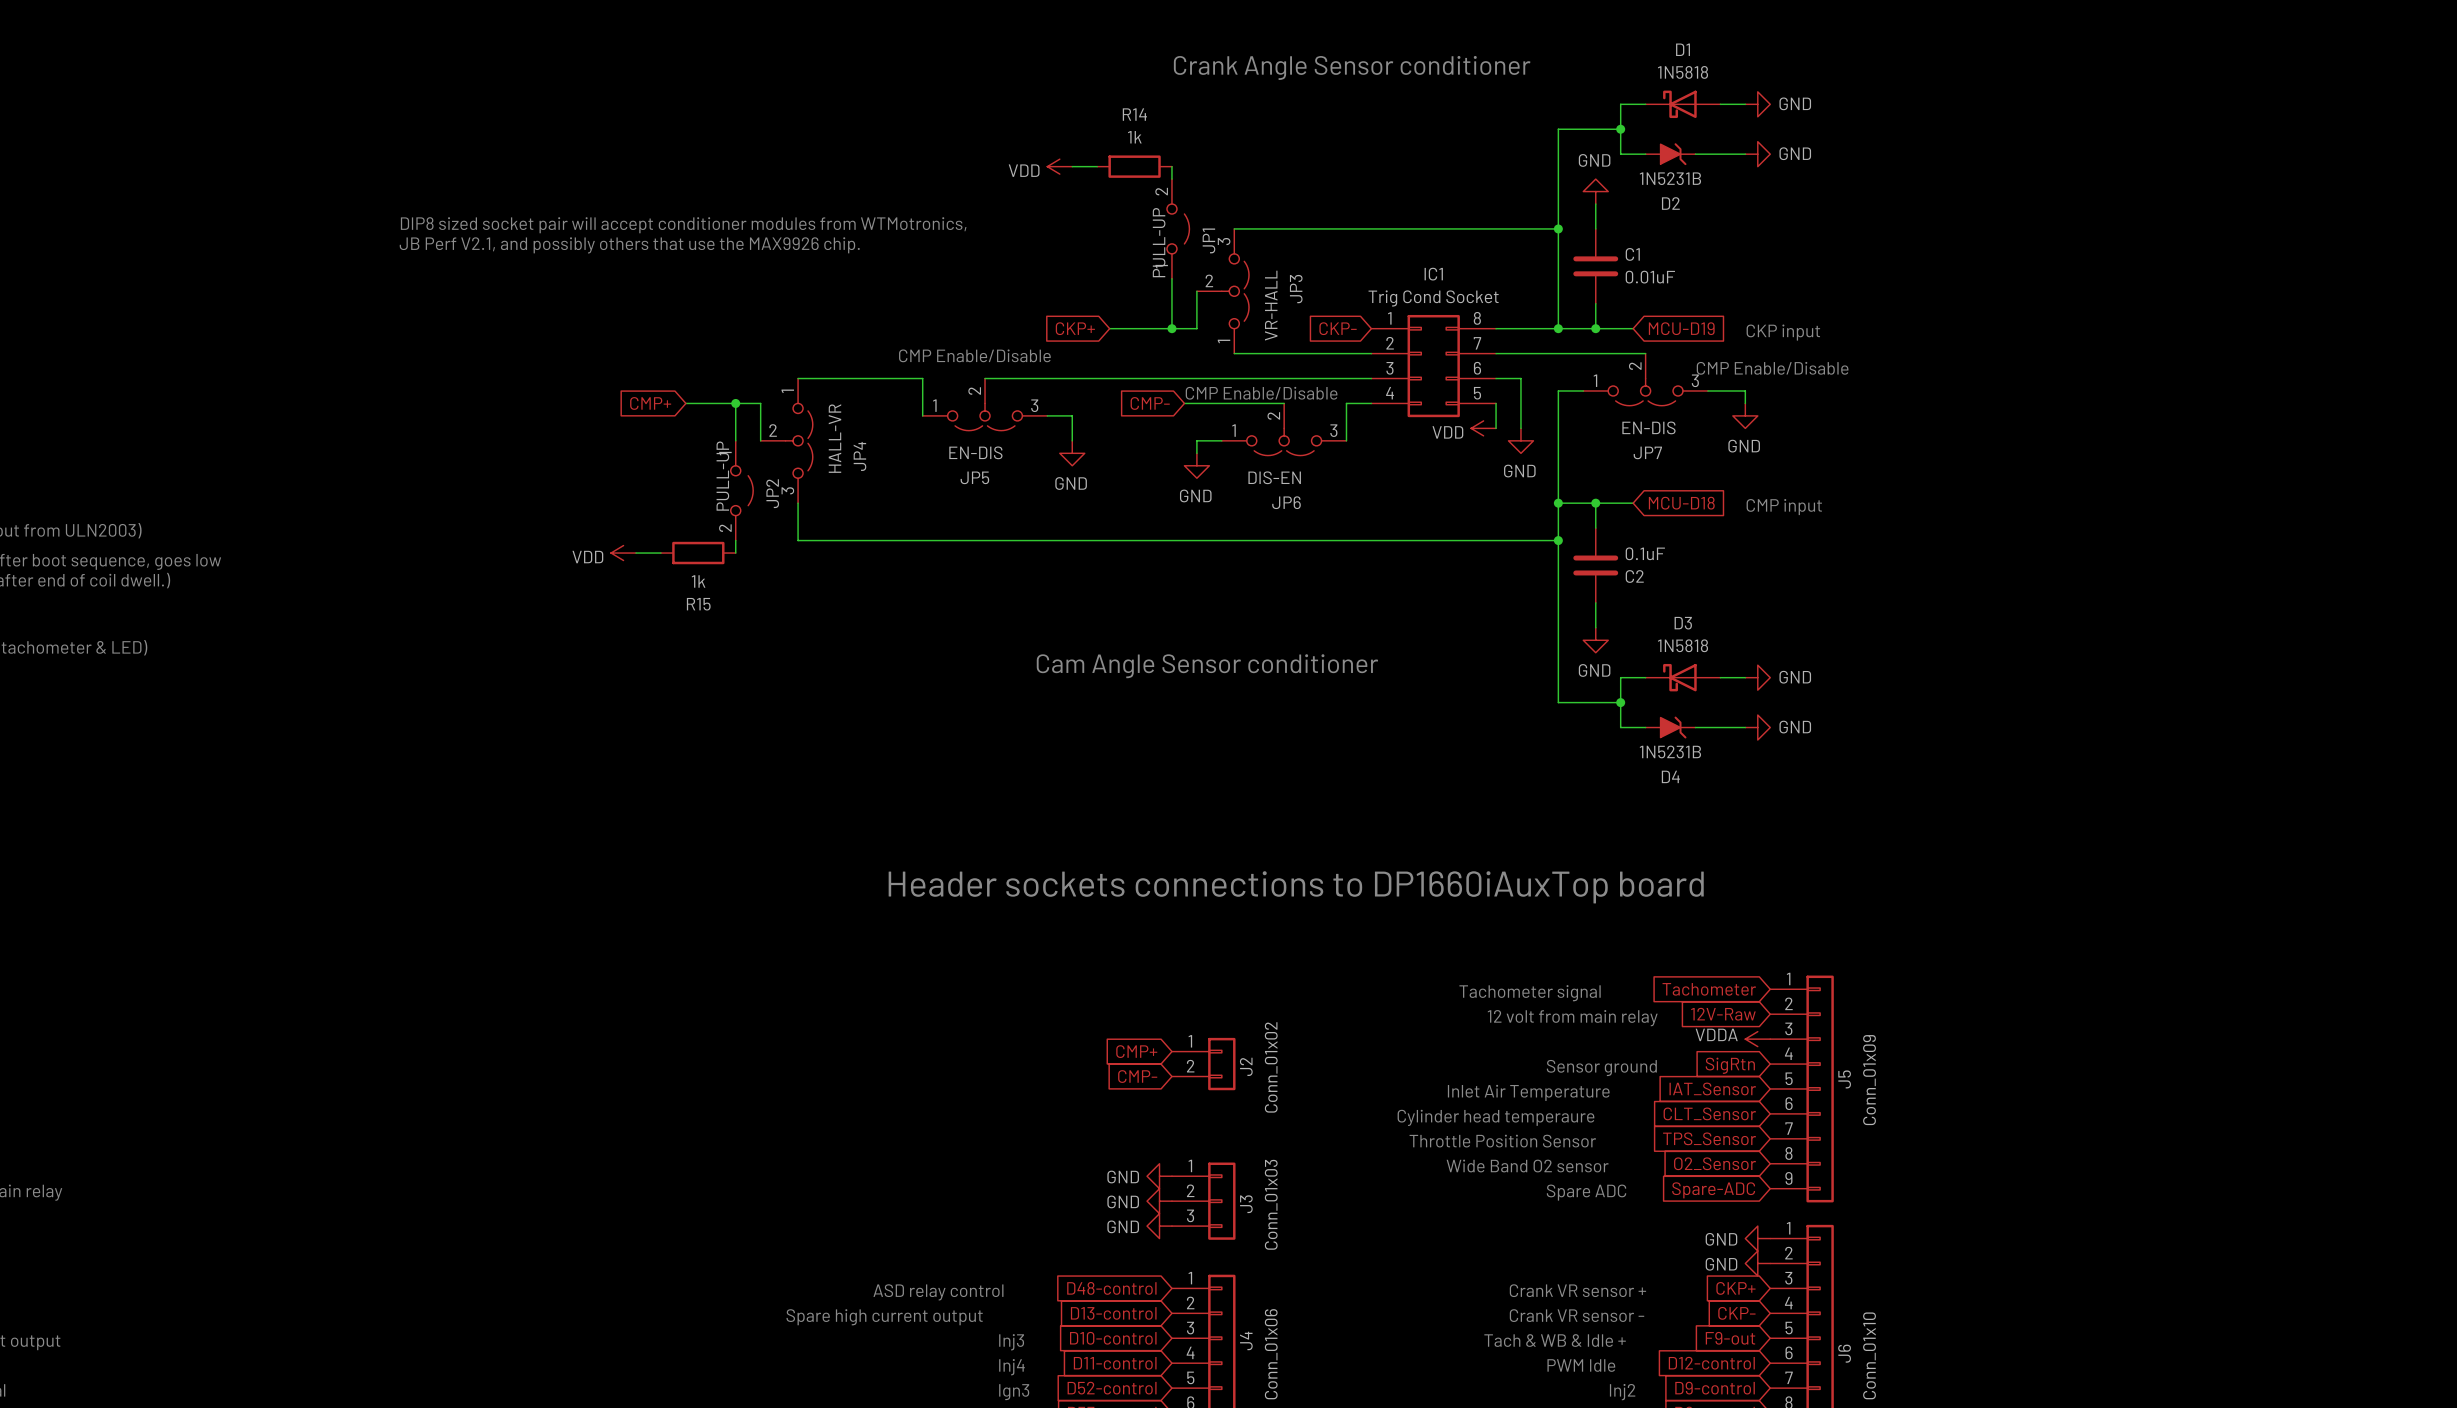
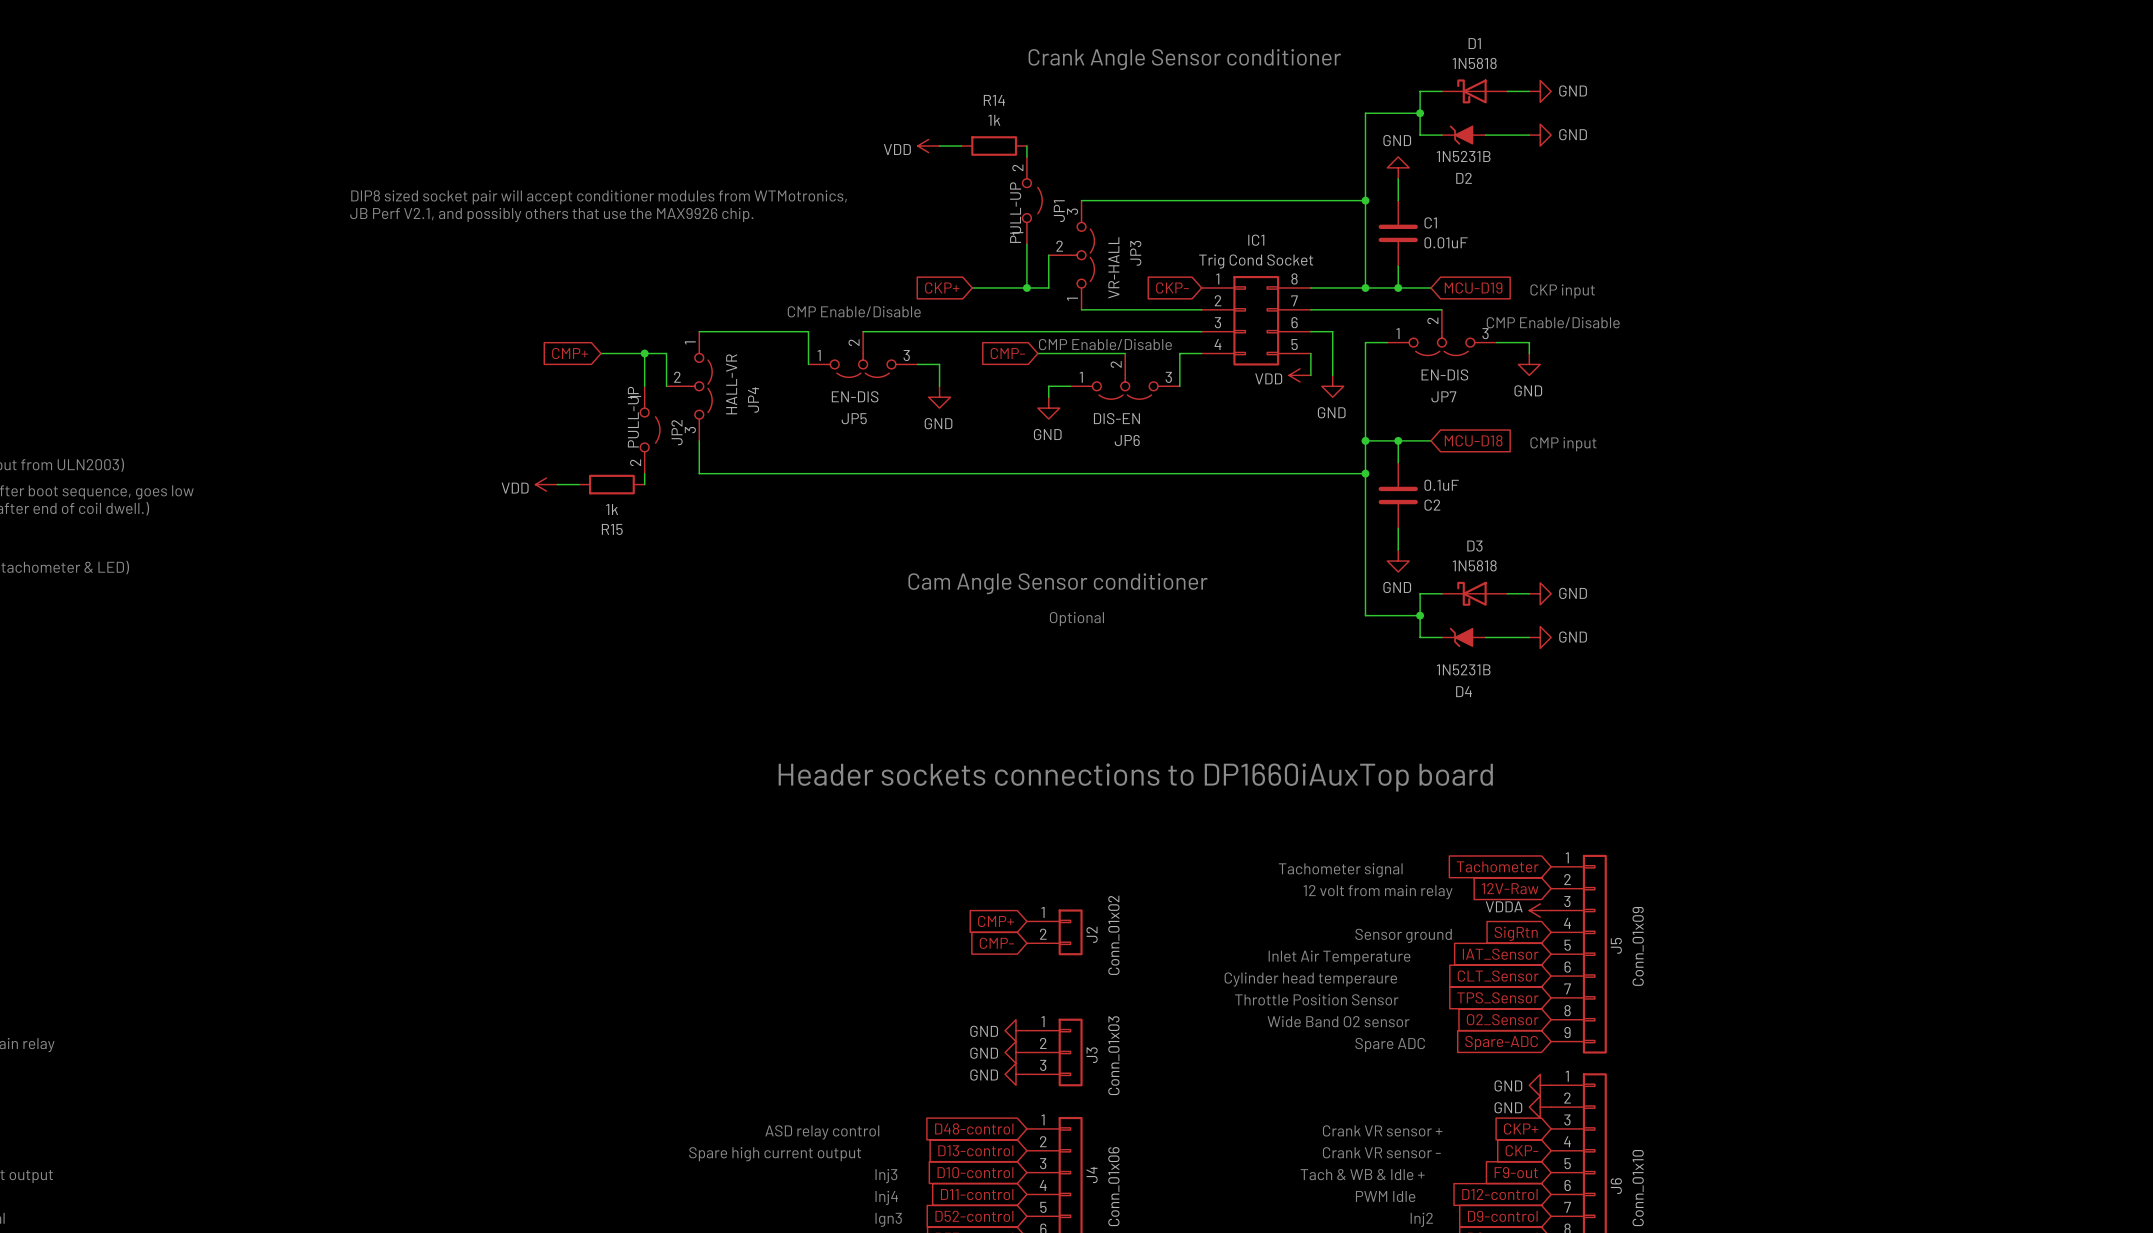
D2 rotation: 0° (1673, 154) -> 180° (1461, 135)
text: none -> Optional (1076, 619)
D4 rotation: 0° (1673, 727) -> 180° (1461, 637)

